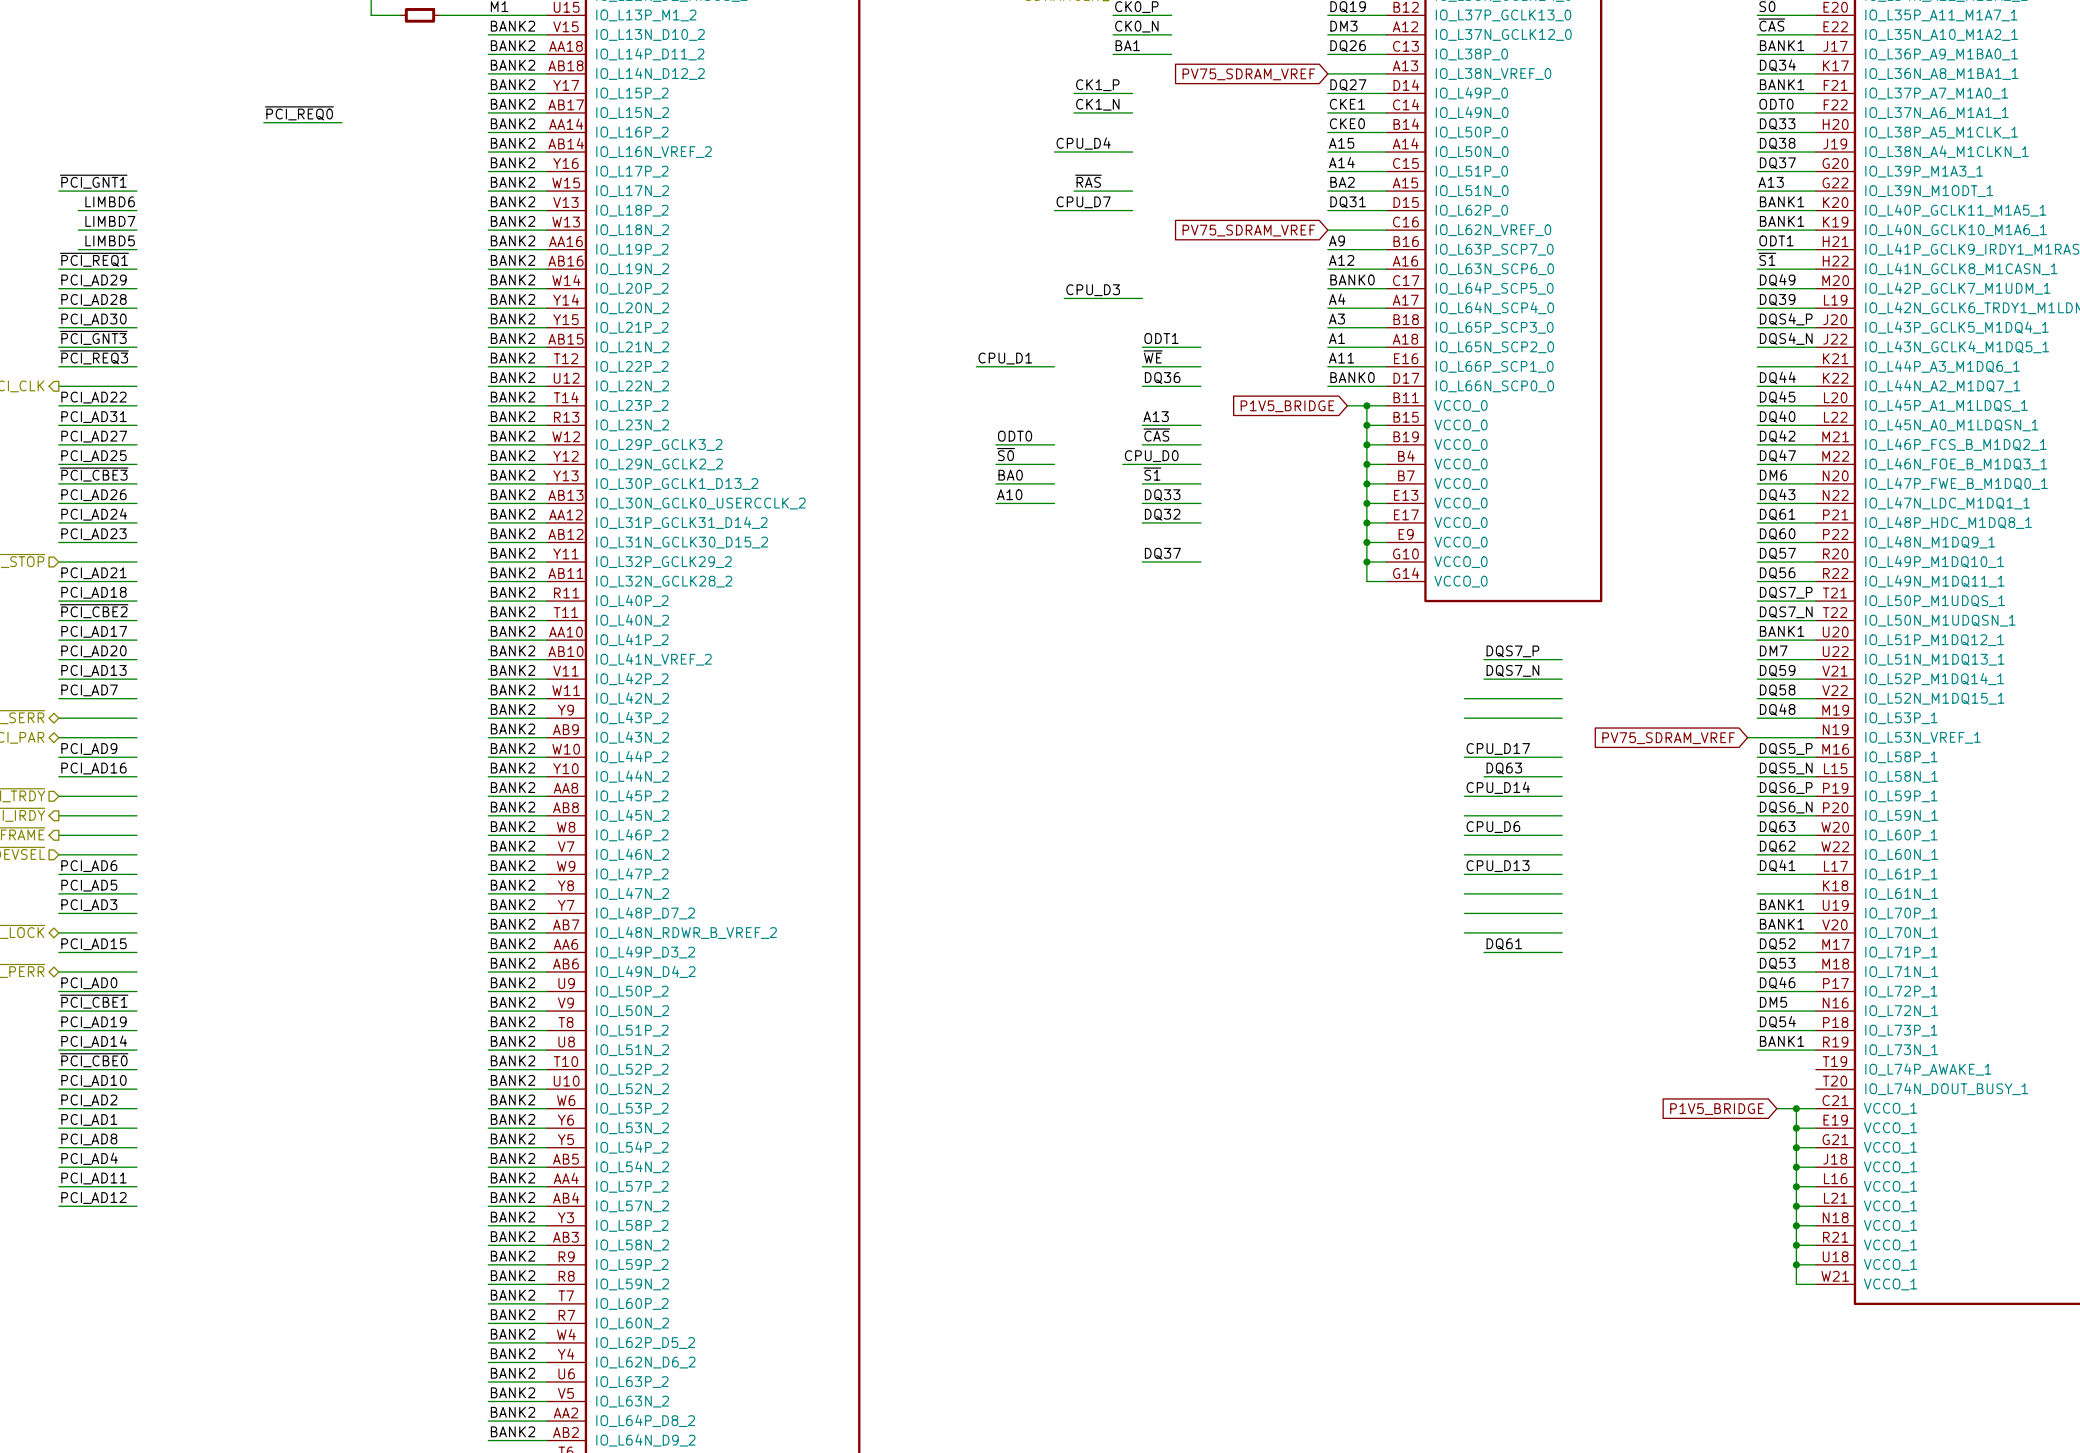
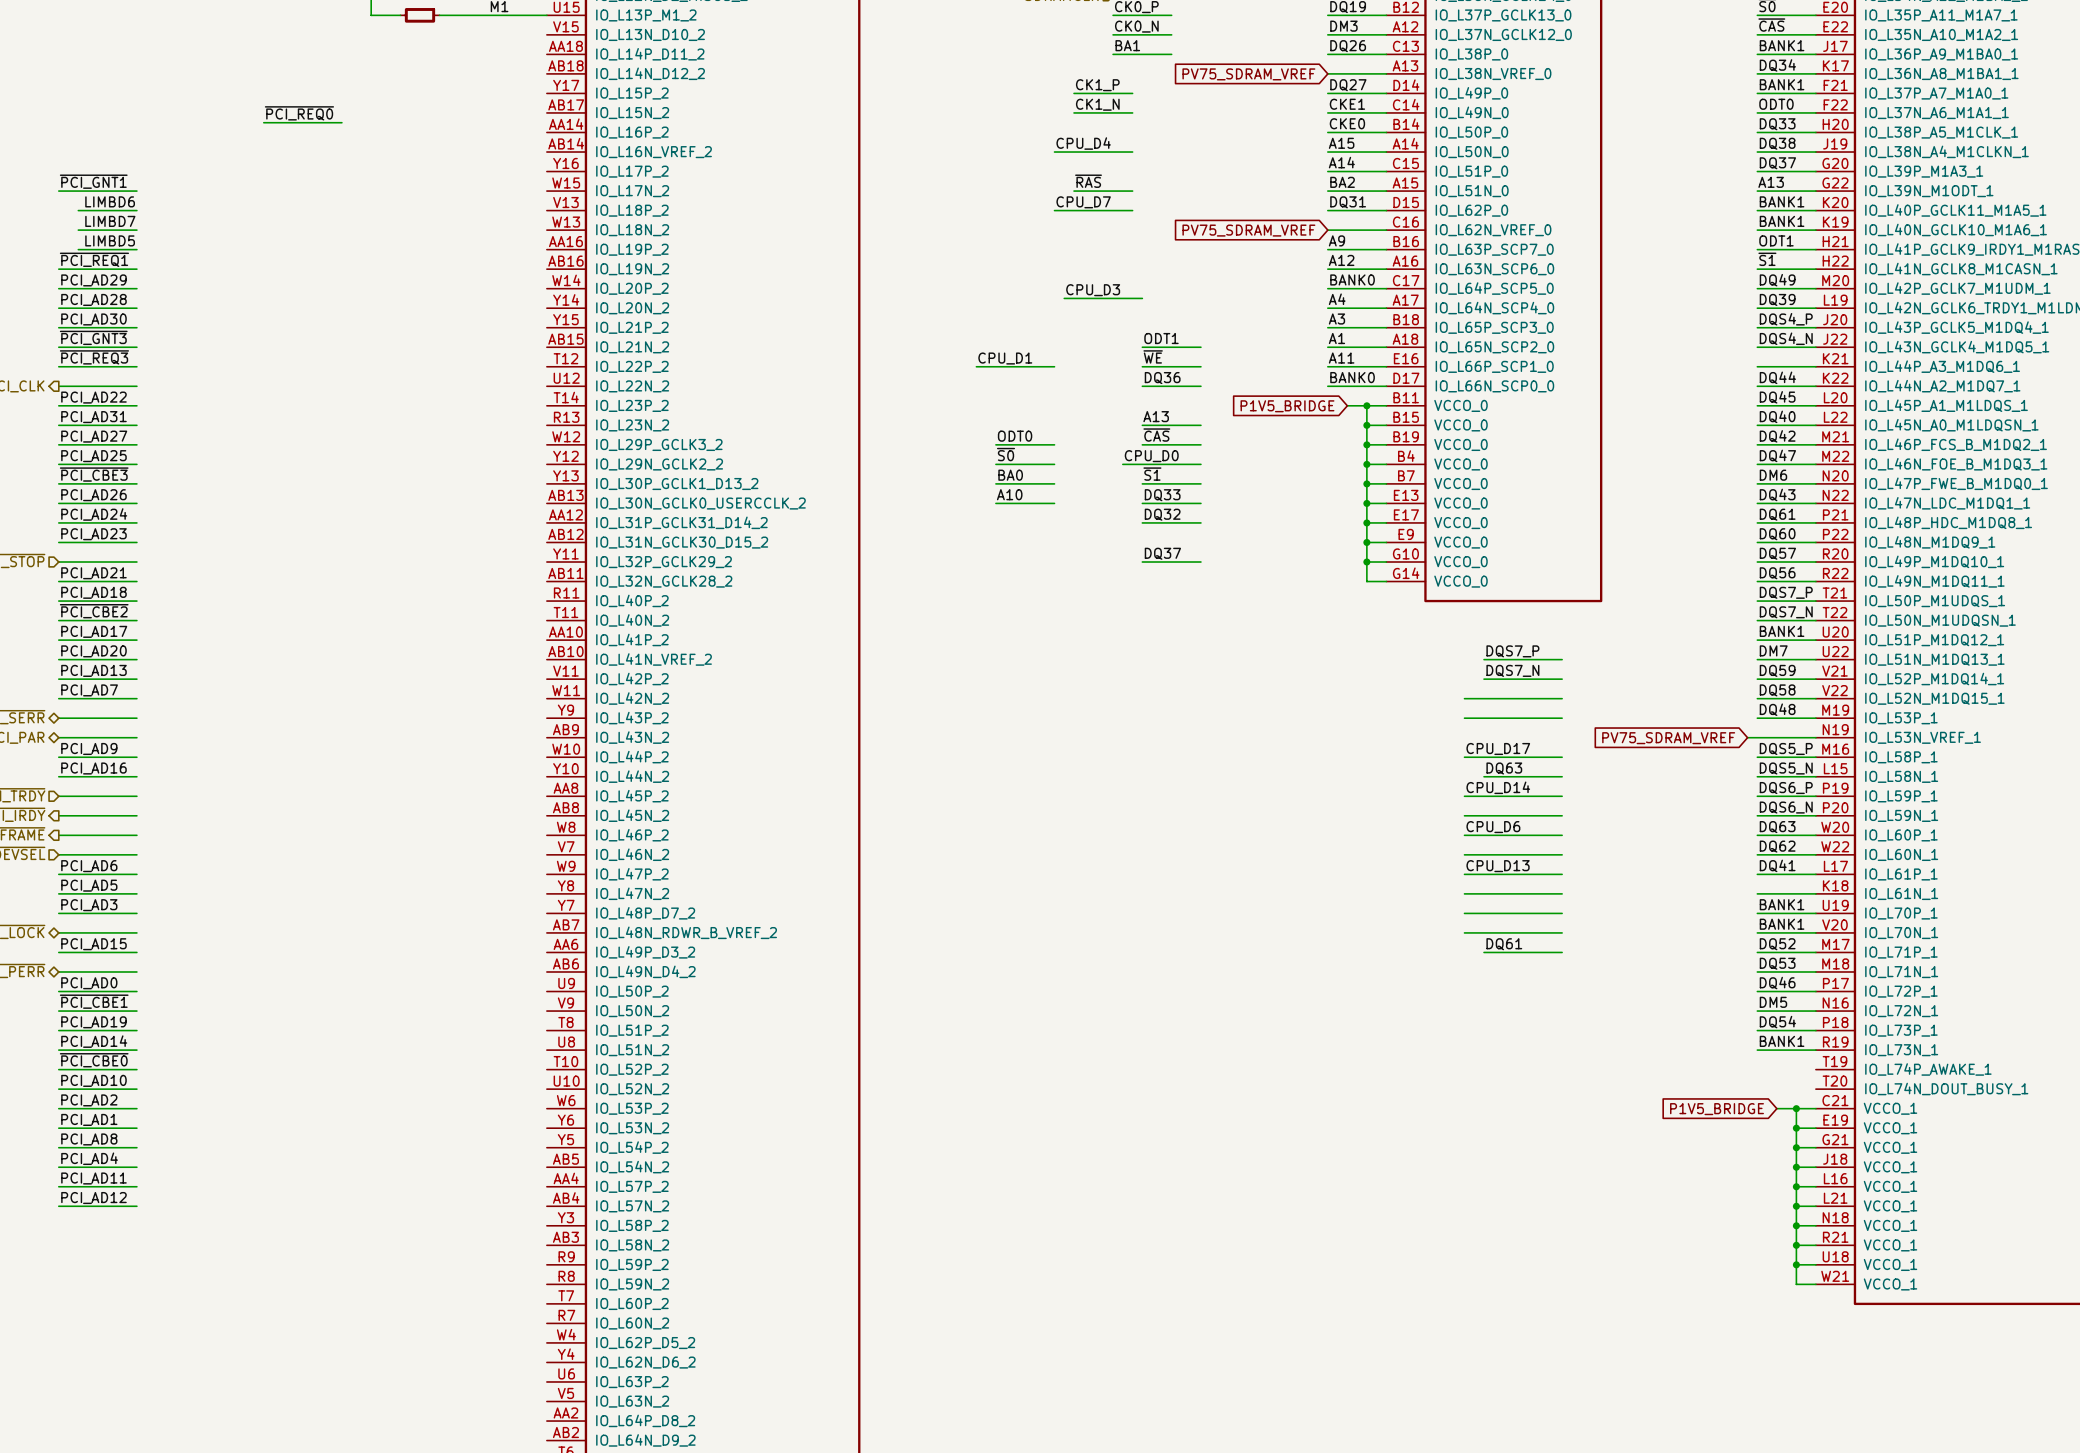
label: BANK2 (513, 26) -> none
wire: (488, 34) (546, 34) -> none
label: BANK2 (513, 45) -> none
wire: (488, 54) (546, 54) -> none
label: BANK2 (513, 65) -> none
wire: (488, 73) (546, 73) -> none
label: BANK2 (513, 84) -> none
wire: (488, 93) (546, 93) -> none
label: BANK2 (513, 104) -> none
wire: (488, 112) (546, 112) -> none
label: BANK2 (513, 123) -> none
wire: (488, 132) (546, 132) -> none
label: BANK2 (513, 143) -> none
wire: (488, 152) (546, 152) -> none
label: BANK2 (513, 162) -> none
wire: (488, 171) (546, 171) -> none
label: BANK2 (513, 182) -> none
wire: (488, 191) (546, 191) -> none
label: BANK2 (513, 201) -> none
wire: (488, 210) (546, 210) -> none
label: BANK2 (513, 221) -> none
wire: (488, 230) (546, 230) -> none
label: BANK2 (513, 240) -> none
wire: (488, 249) (546, 249) -> none
label: BANK2 (513, 260) -> none
wire: (488, 269) (546, 269) -> none
label: BANK2 (513, 279) -> none
wire: (488, 288) (546, 288) -> none
label: BANK2 (513, 299) -> none
wire: (488, 308) (546, 308) -> none
label: BANK2 (513, 319) -> none
wire: (488, 327) (546, 327) -> none
label: BANK2 (513, 338) -> none
wire: (488, 347) (546, 347) -> none
label: BANK2 (513, 358) -> none
wire: (488, 366) (546, 366) -> none
label: BANK2 (513, 377) -> none
wire: (488, 386) (546, 386) -> none
label: BANK2 (513, 397) -> none
wire: (488, 405) (546, 405) -> none
label: BANK2 (513, 416) -> none
wire: (488, 425) (546, 425) -> none
label: BANK2 (513, 436) -> none
wire: (488, 444) (546, 444) -> none
label: BANK2 (513, 455) -> none
wire: (488, 464) (546, 464) -> none
label: BANK2 (513, 475) -> none
wire: (488, 483) (546, 483) -> none
label: BANK2 (513, 494) -> none
wire: (488, 503) (546, 503) -> none
label: BANK2 (513, 514) -> none
wire: (488, 522) (546, 522) -> none
label: BANK2 (513, 533) -> none
wire: (488, 542) (546, 542) -> none
label: BANK2 (513, 553) -> none
wire: (488, 562) (546, 562) -> none
label: BANK2 (513, 572) -> none
wire: (488, 581) (546, 581) -> none
label: BANK2 (513, 592) -> none
wire: (488, 601) (546, 601) -> none
label: BANK2 (513, 611) -> none
wire: (488, 620) (546, 620) -> none
label: BANK2 (513, 631) -> none
wire: (488, 640) (546, 640) -> none
label: BANK2 (513, 650) -> none
wire: (488, 659) (546, 659) -> none
label: BANK2 (513, 670) -> none
wire: (488, 679) (546, 679) -> none
label: BANK2 (513, 689) -> none
wire: (488, 698) (546, 698) -> none
label: BANK2 (513, 709) -> none
wire: (488, 718) (546, 718) -> none
label: BANK2 (513, 729) -> none
wire: (488, 737) (546, 737) -> none
label: BANK2 (513, 748) -> none
wire: (488, 757) (546, 757) -> none
label: BANK2 (513, 768) -> none
wire: (488, 776) (546, 776) -> none
label: BANK2 (513, 787) -> none
wire: (488, 796) (546, 796) -> none
label: BANK2 (513, 807) -> none
wire: (488, 815) (546, 815) -> none
label: BANK2 (513, 826) -> none
wire: (488, 835) (546, 835) -> none
label: BANK2 (513, 846) -> none
wire: (488, 854) (546, 854) -> none
label: BANK2 (513, 865) -> none
wire: (488, 874) (546, 874) -> none
label: BANK2 (513, 885) -> none
wire: (488, 893) (546, 893) -> none
label: BANK2 (513, 904) -> none
wire: (488, 913) (546, 913) -> none
label: BANK2 (513, 924) -> none
wire: (488, 932) (546, 932) -> none
label: BANK2 (513, 943) -> none
wire: (488, 952) (546, 952) -> none
label: BANK2 (513, 963) -> none
wire: (488, 971) (546, 971) -> none
label: BANK2 (513, 982) -> none
wire: (488, 991) (546, 991) -> none
label: BANK2 (513, 1002) -> none
wire: (488, 1011) (546, 1011) -> none
label: BANK2 (513, 1021) -> none
wire: (488, 1030) (546, 1030) -> none
label: BANK2 (513, 1041) -> none
wire: (488, 1050) (546, 1050) -> none
label: BANK2 (513, 1060) -> none
wire: (488, 1069) (546, 1069) -> none
label: BANK2 (513, 1080) -> none
wire: (488, 1089) (546, 1089) -> none
label: BANK2 (513, 1099) -> none
wire: (488, 1108) (546, 1108) -> none
label: BANK2 (513, 1119) -> none
wire: (488, 1128) (546, 1128) -> none
label: BANK2 (513, 1138) -> none
wire: (488, 1147) (546, 1147) -> none
label: BANK2 (513, 1158) -> none
wire: (488, 1167) (546, 1167) -> none
label: BANK2 (513, 1178) -> none
wire: (488, 1186) (546, 1186) -> none
label: BANK2 (513, 1197) -> none
wire: (488, 1206) (546, 1206) -> none
label: BANK2 (513, 1217) -> none
wire: (488, 1225) (546, 1225) -> none
label: BANK2 (513, 1236) -> none
wire: (488, 1245) (546, 1245) -> none
label: BANK2 (513, 1256) -> none
wire: (488, 1264) (546, 1264) -> none
label: BANK2 (513, 1275) -> none
wire: (488, 1284) (546, 1284) -> none
label: BANK2 (513, 1295) -> none
wire: (488, 1303) (546, 1303) -> none
label: BANK2 (513, 1314) -> none
wire: (488, 1323) (546, 1323) -> none
label: BANK2 (513, 1334) -> none
wire: (488, 1342) (546, 1342) -> none
label: BANK2 (513, 1353) -> none
wire: (488, 1362) (546, 1362) -> none
label: BANK2 (513, 1373) -> none
wire: (488, 1381) (546, 1381) -> none
label: BANK2 (513, 1392) -> none
wire: (488, 1401) (546, 1401) -> none
label: BANK2 (513, 1412) -> none
wire: (488, 1421) (546, 1421) -> none
label: BANK2 (513, 1431) -> none
wire: (488, 1440) (546, 1440) -> none

